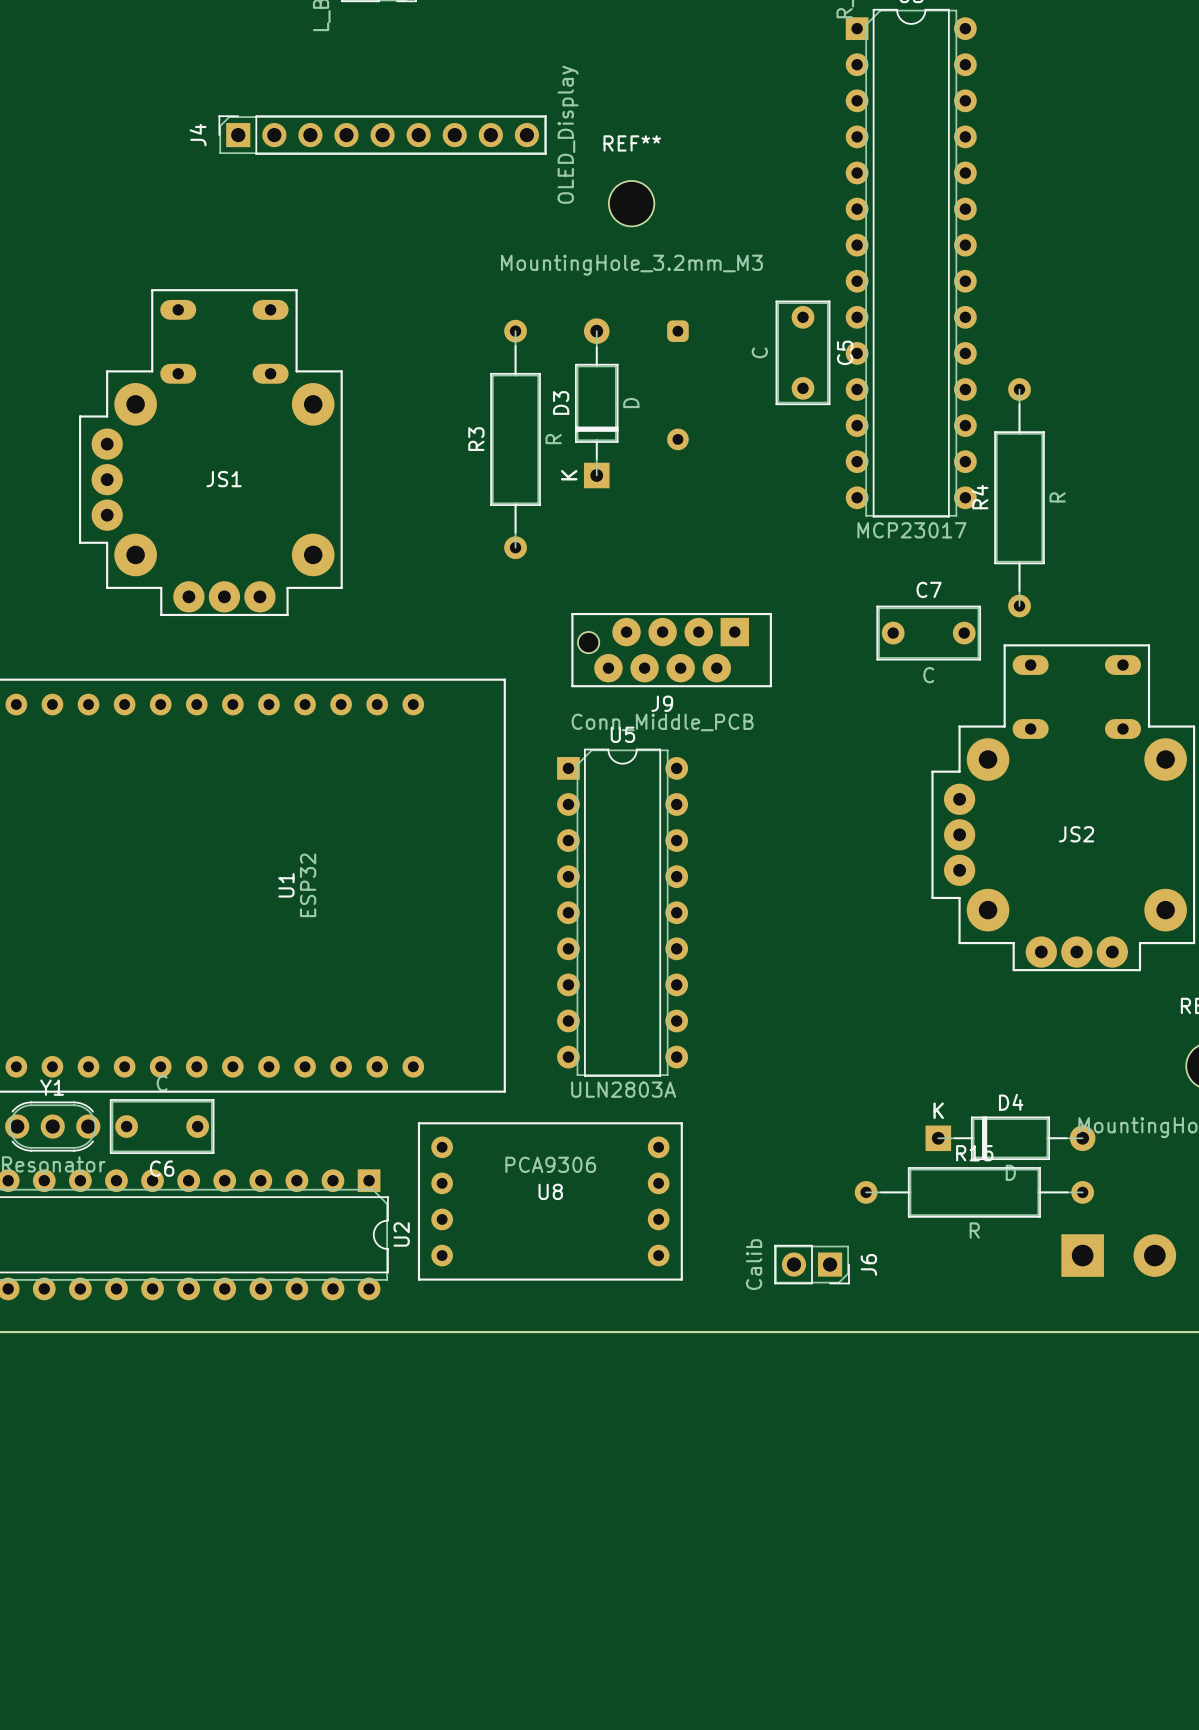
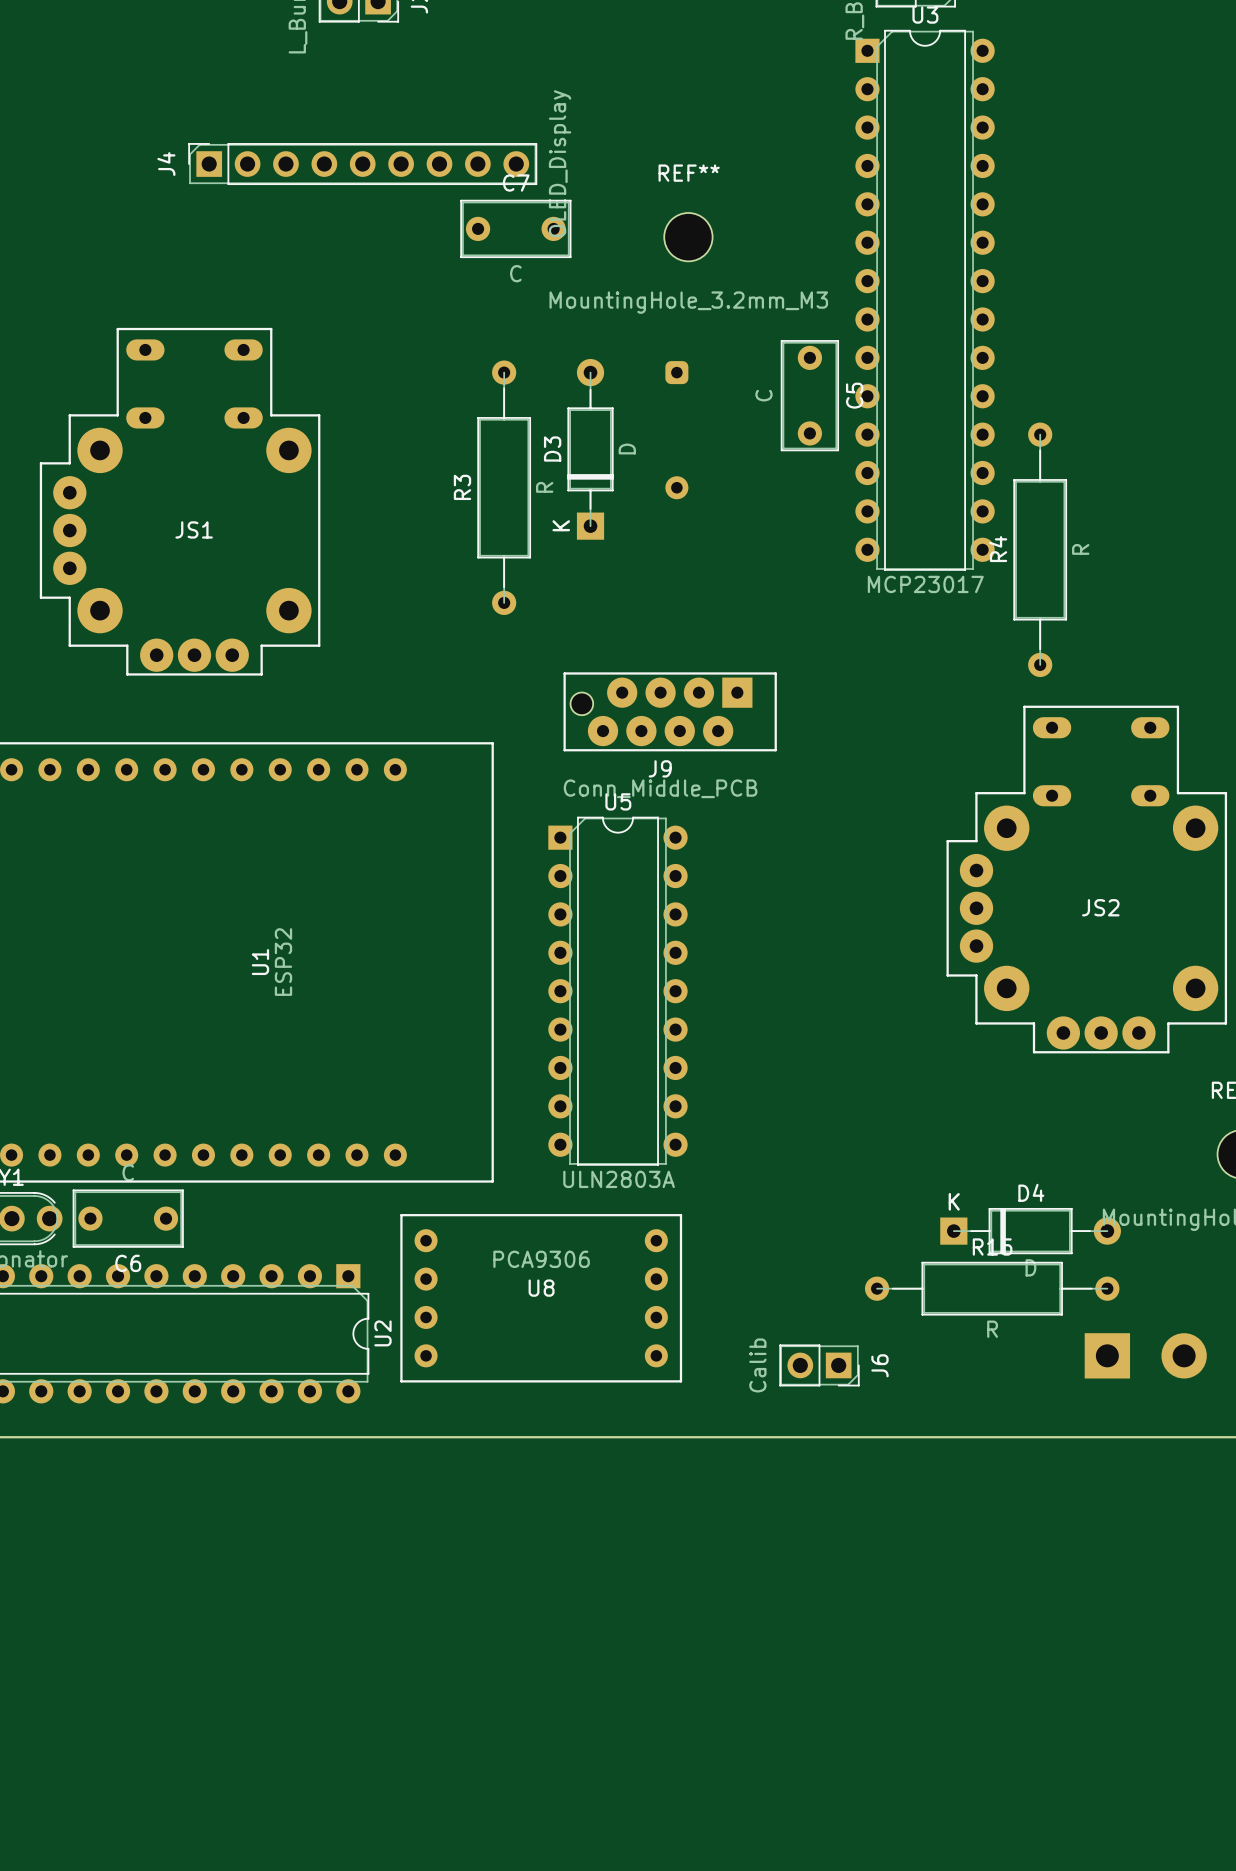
REF** position: (631, 203) -> (688, 237)
C7 position: (928, 633) -> (515, 228)

